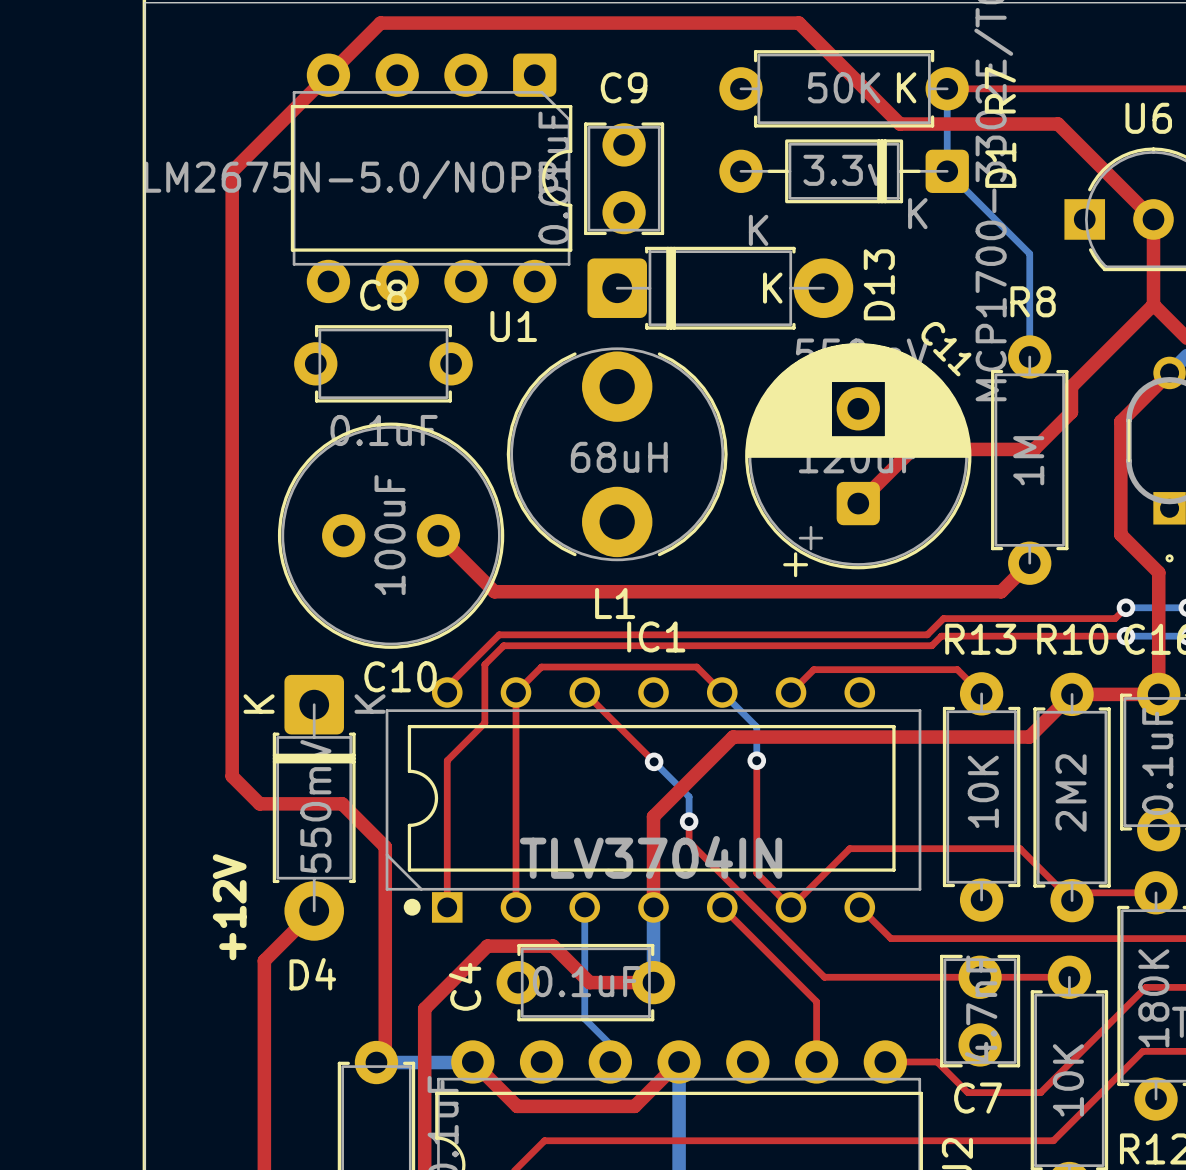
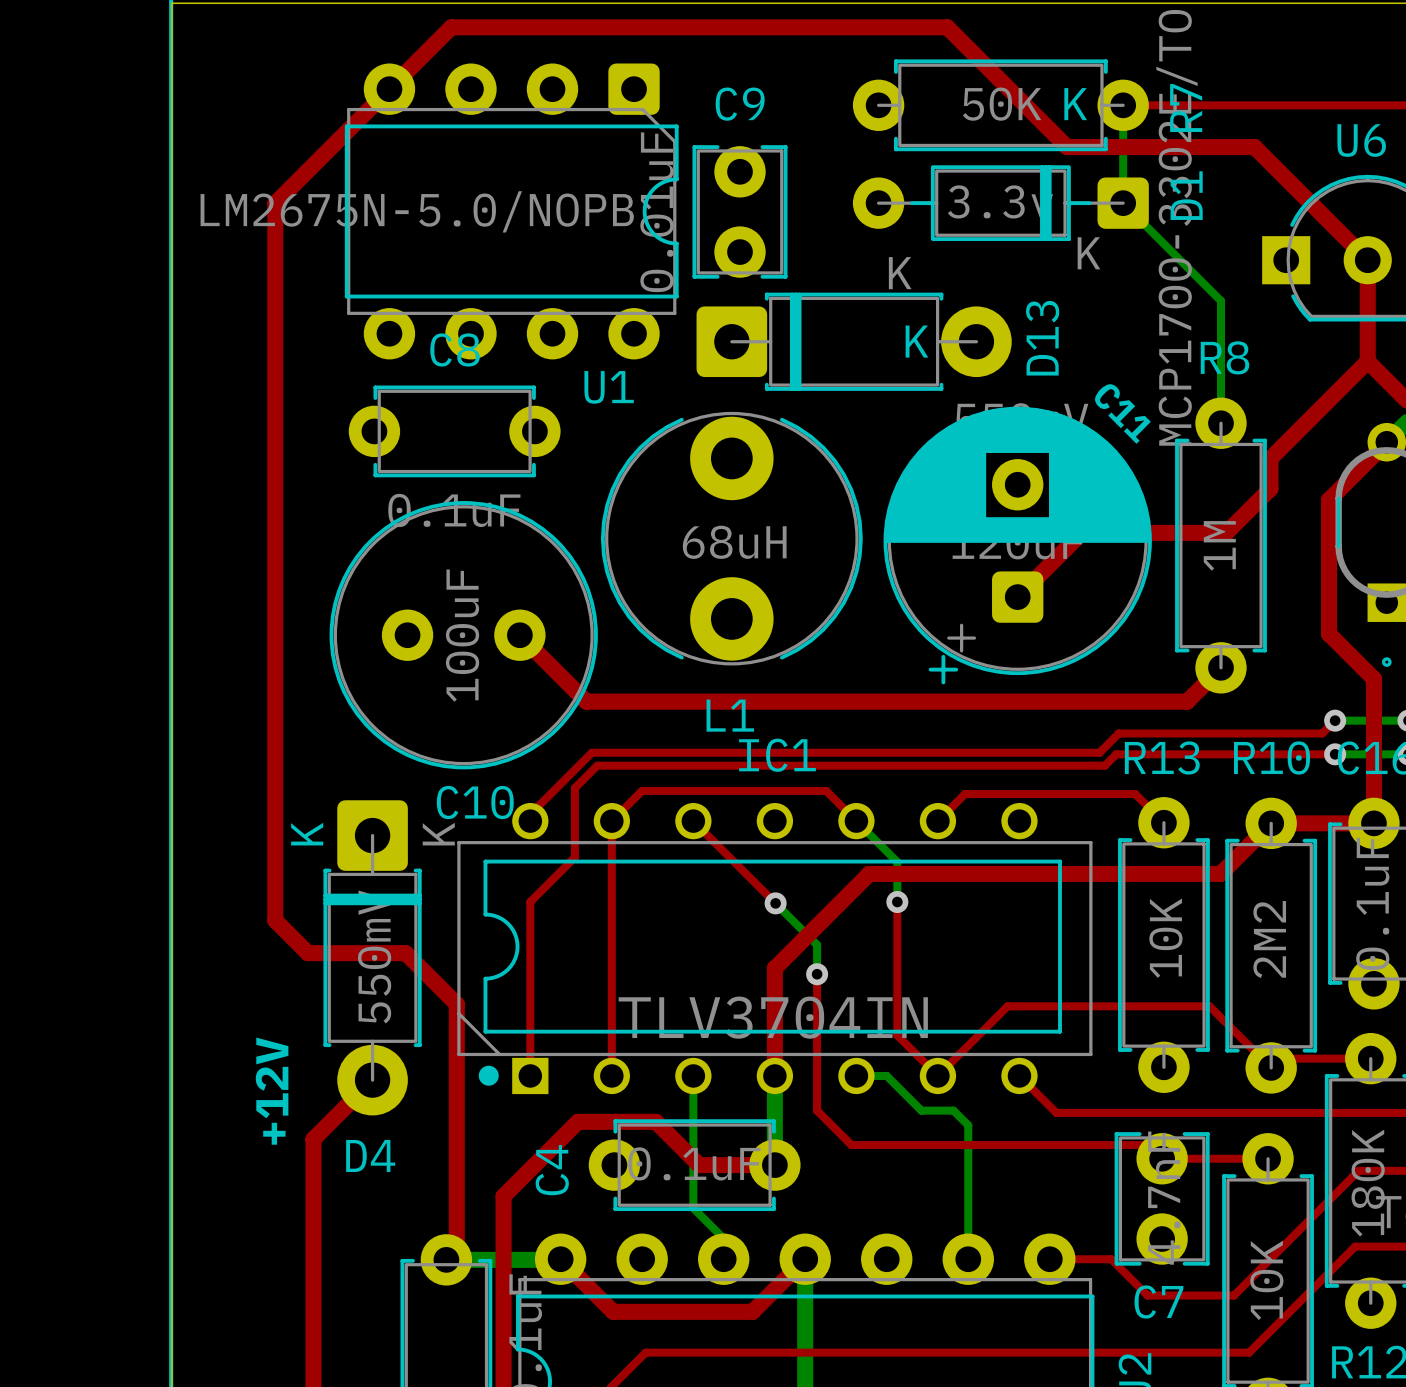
top track: (689, 841) (824, 977) (980, 977) -> (817, 998) (817, 1110) (851, 1145) (1148, 1145)
top track: (722, 907) (816, 1001) (816, 1061) -> none
bottom track: none -> (856, 1075) (886, 1075) (921, 1110) (953, 1110) (968, 1125) (968, 1259)

